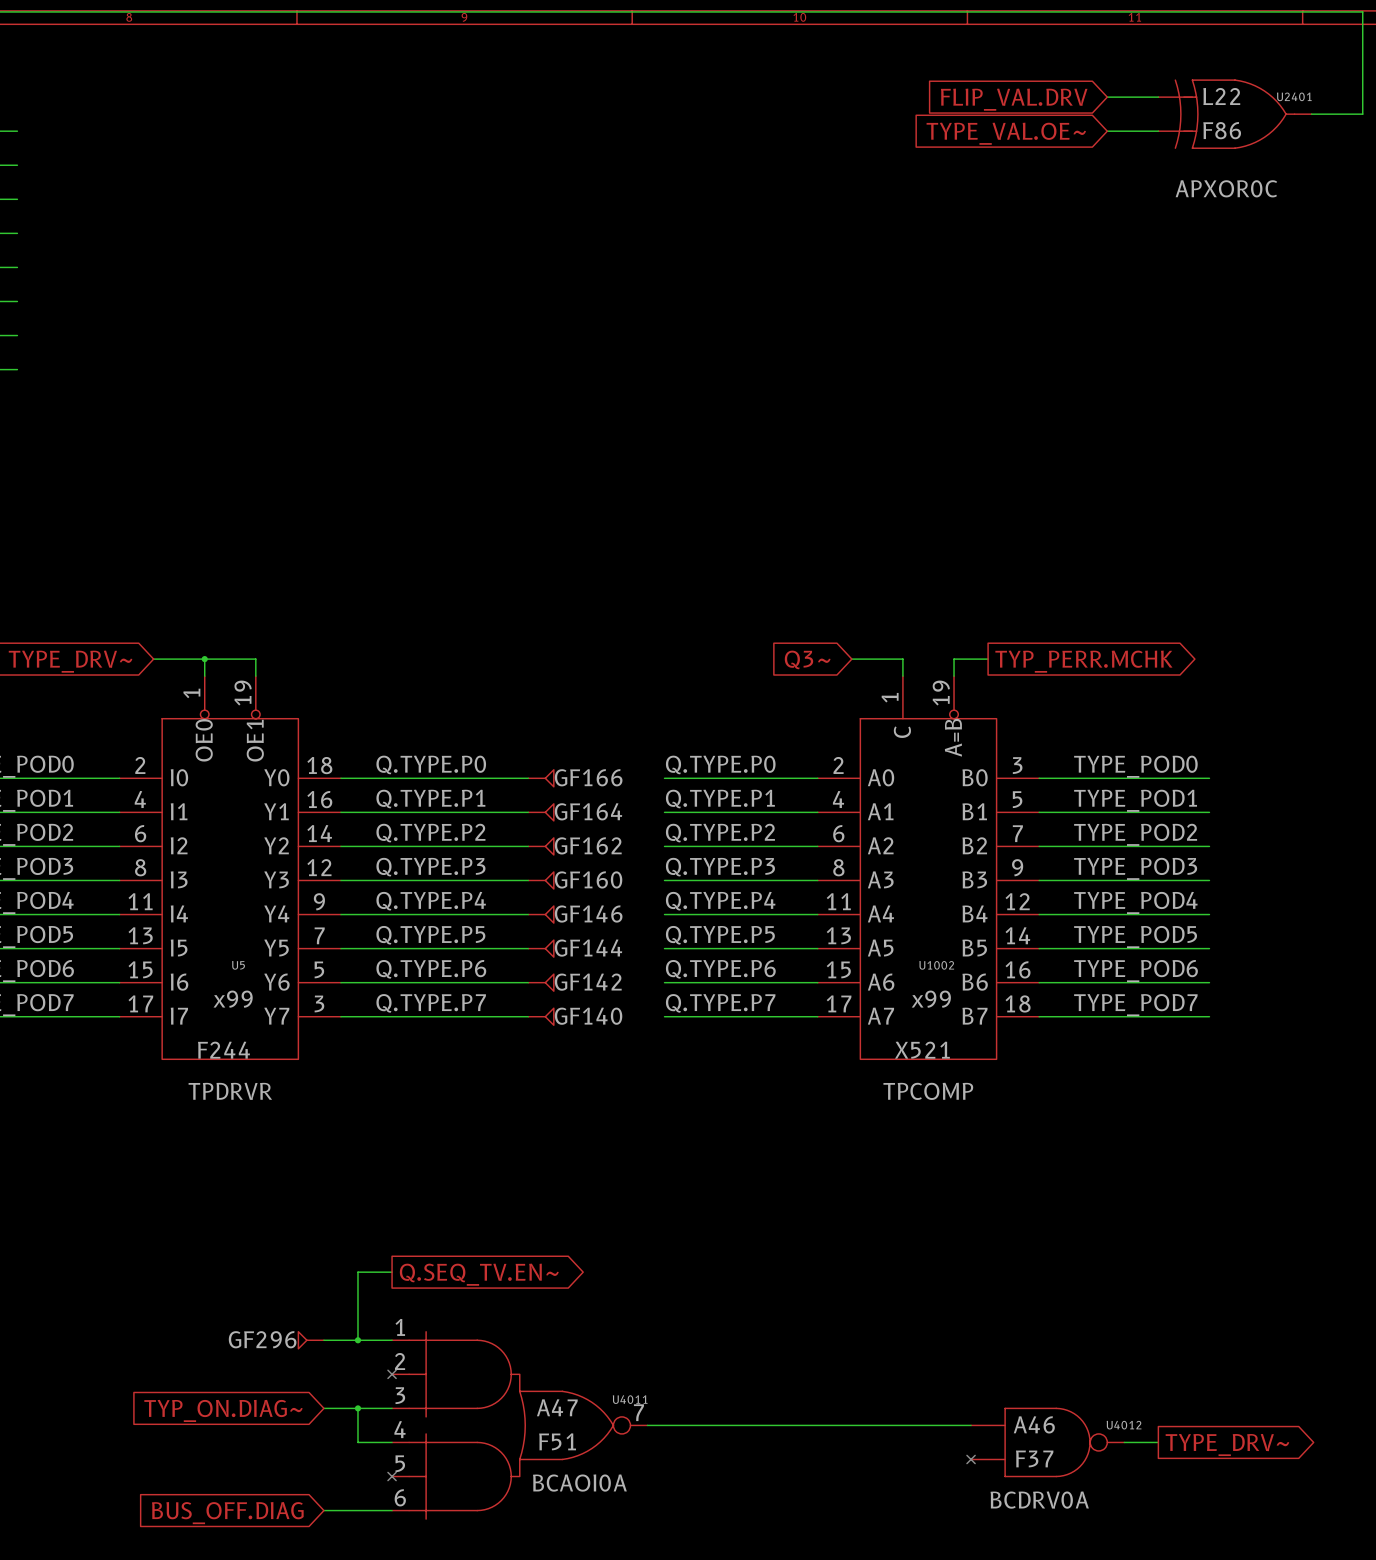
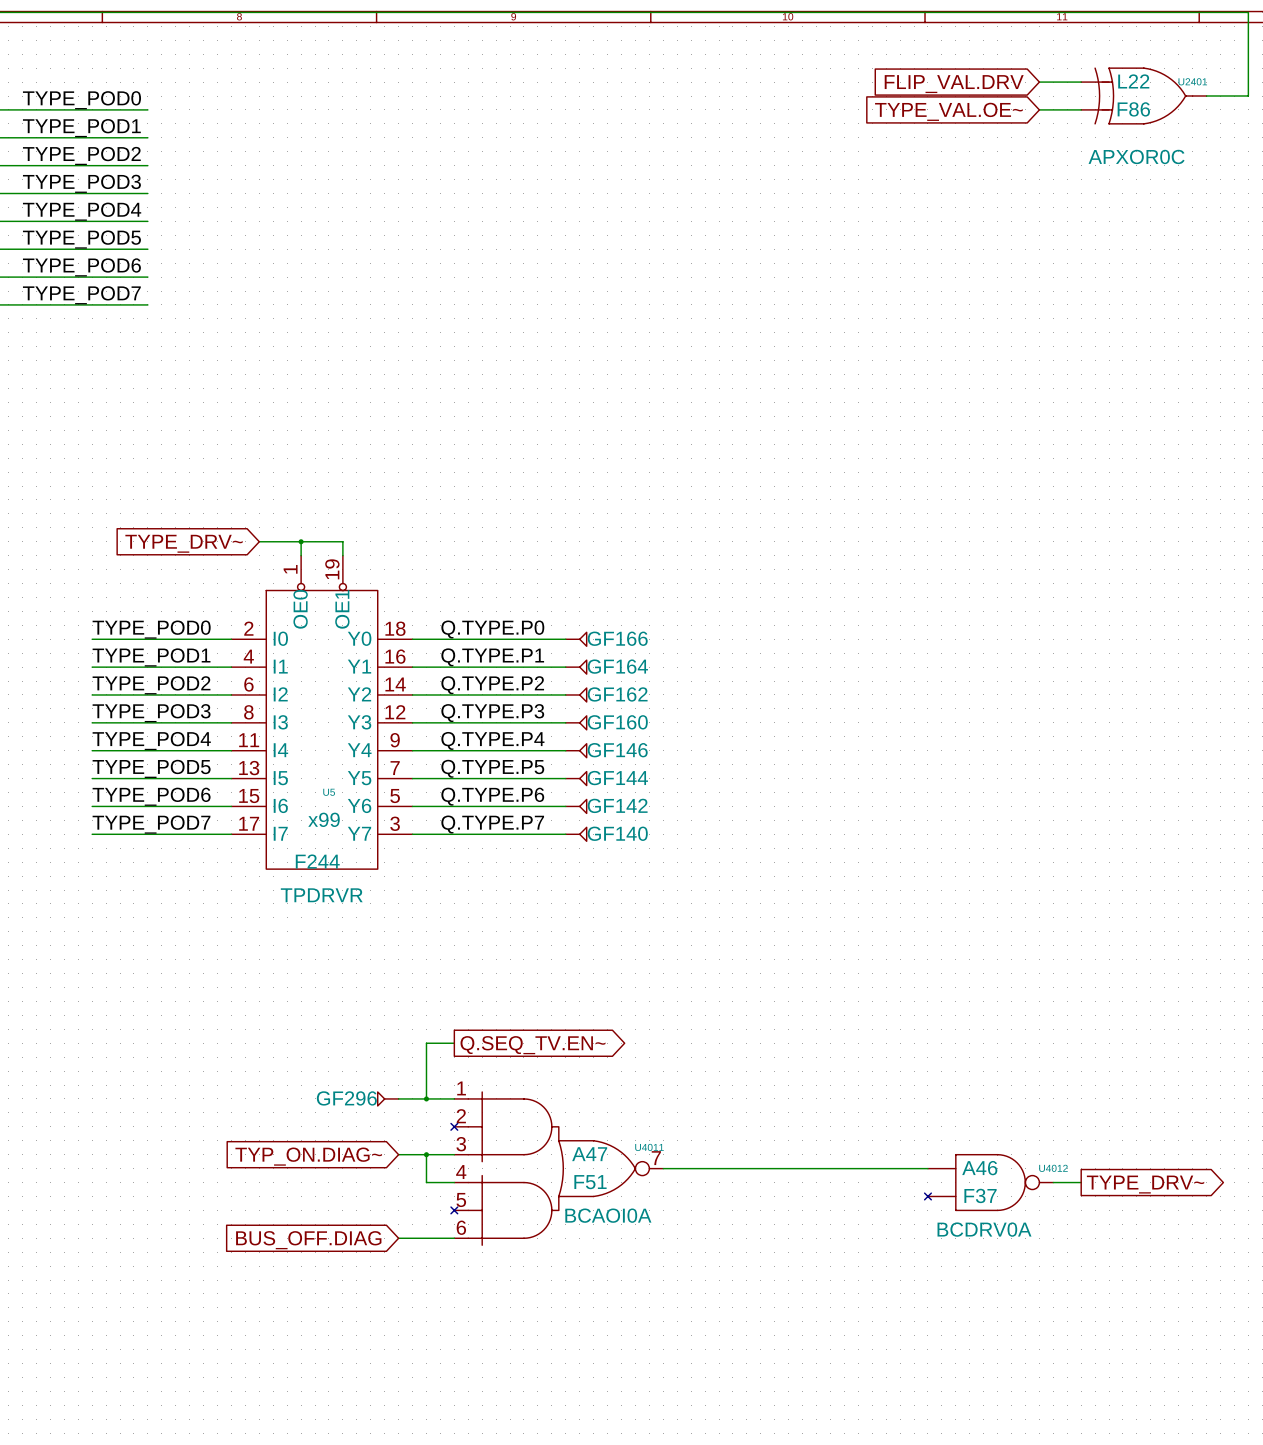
global label: Q3~ (807, 659) -> none
wire: (851, 659) (902, 659) (902, 676) -> none
wire: (988, 659) (954, 659) (954, 676) -> none
global label: TYP_PERR.MCHK (1083, 661) -> none
label: Q.TYPE.P0 (720, 764) -> none
label: TYPE_POD0 (1135, 766) -> none
wire: (664, 778) (817, 778) -> none
wire: (1039, 778) (1209, 778) -> none
label: Q.TYPE.P1 (720, 799) -> none
label: TYPE_POD1 (1135, 800) -> none
wire: (664, 812) (817, 812) -> none
wire: (1039, 812) (1209, 812) -> none
label: Q.TYPE.P2 (720, 833) -> none
label: TYPE_POD2 (1135, 834) -> none
wire: (664, 846) (817, 846) -> none
wire: (1039, 846) (1209, 846) -> none
label: Q.TYPE.P3 (720, 867) -> none
U1002: X521 (928, 867) -> none
label: TYPE_POD3 (1135, 868) -> none
wire: (664, 880) (817, 880) -> none
wire: (1039, 880) (1209, 880) -> none
label: Q.TYPE.P4 (720, 901) -> none
label: TYPE_POD4 (1135, 902) -> none
wire: (664, 914) (817, 914) -> none
wire: (1039, 914) (1209, 914) -> none
label: Q.TYPE.P5 (720, 935) -> none
label: TYPE_POD5 (1135, 936) -> none
wire: (664, 948) (817, 948) -> none
wire: (1039, 948) (1209, 948) -> none
label: Q.TYPE.P6 (720, 969) -> none
label: TYPE_POD6 (1136, 971) -> none
wire: (664, 982) (817, 982) -> none
wire: (1039, 982) (1209, 982) -> none
label: Q.TYPE.P7 (720, 1003) -> none
label: TYPE_POD7 (1135, 1005) -> none
wire: (664, 1016) (817, 1016) -> none
wire: (1039, 1016) (1209, 1016) -> none

